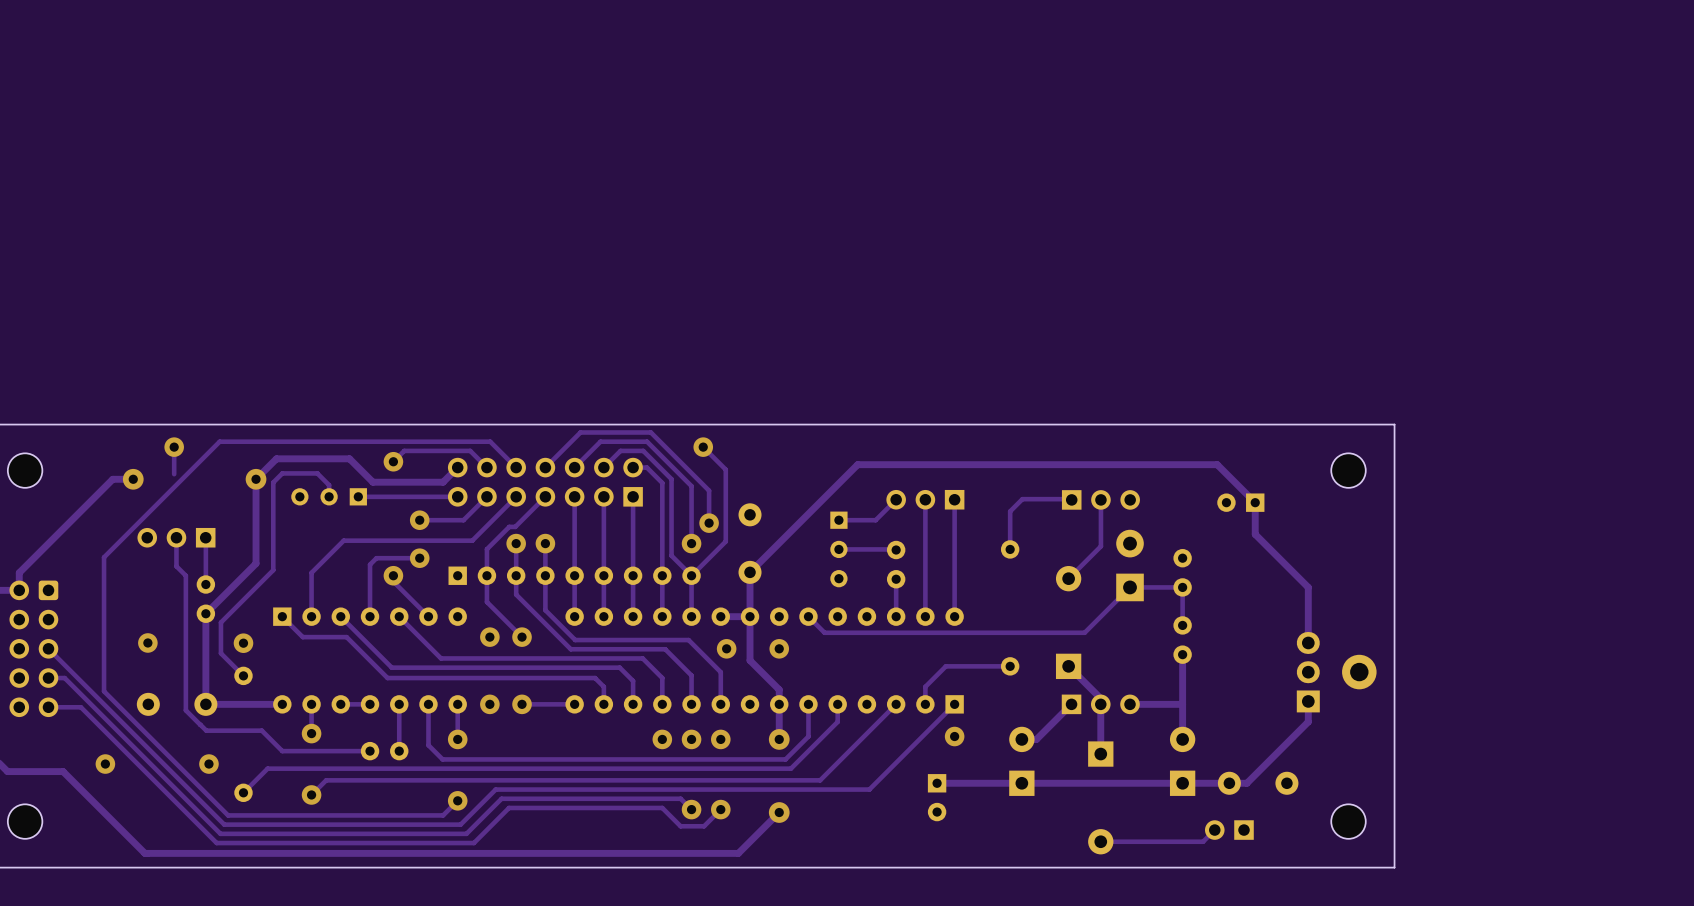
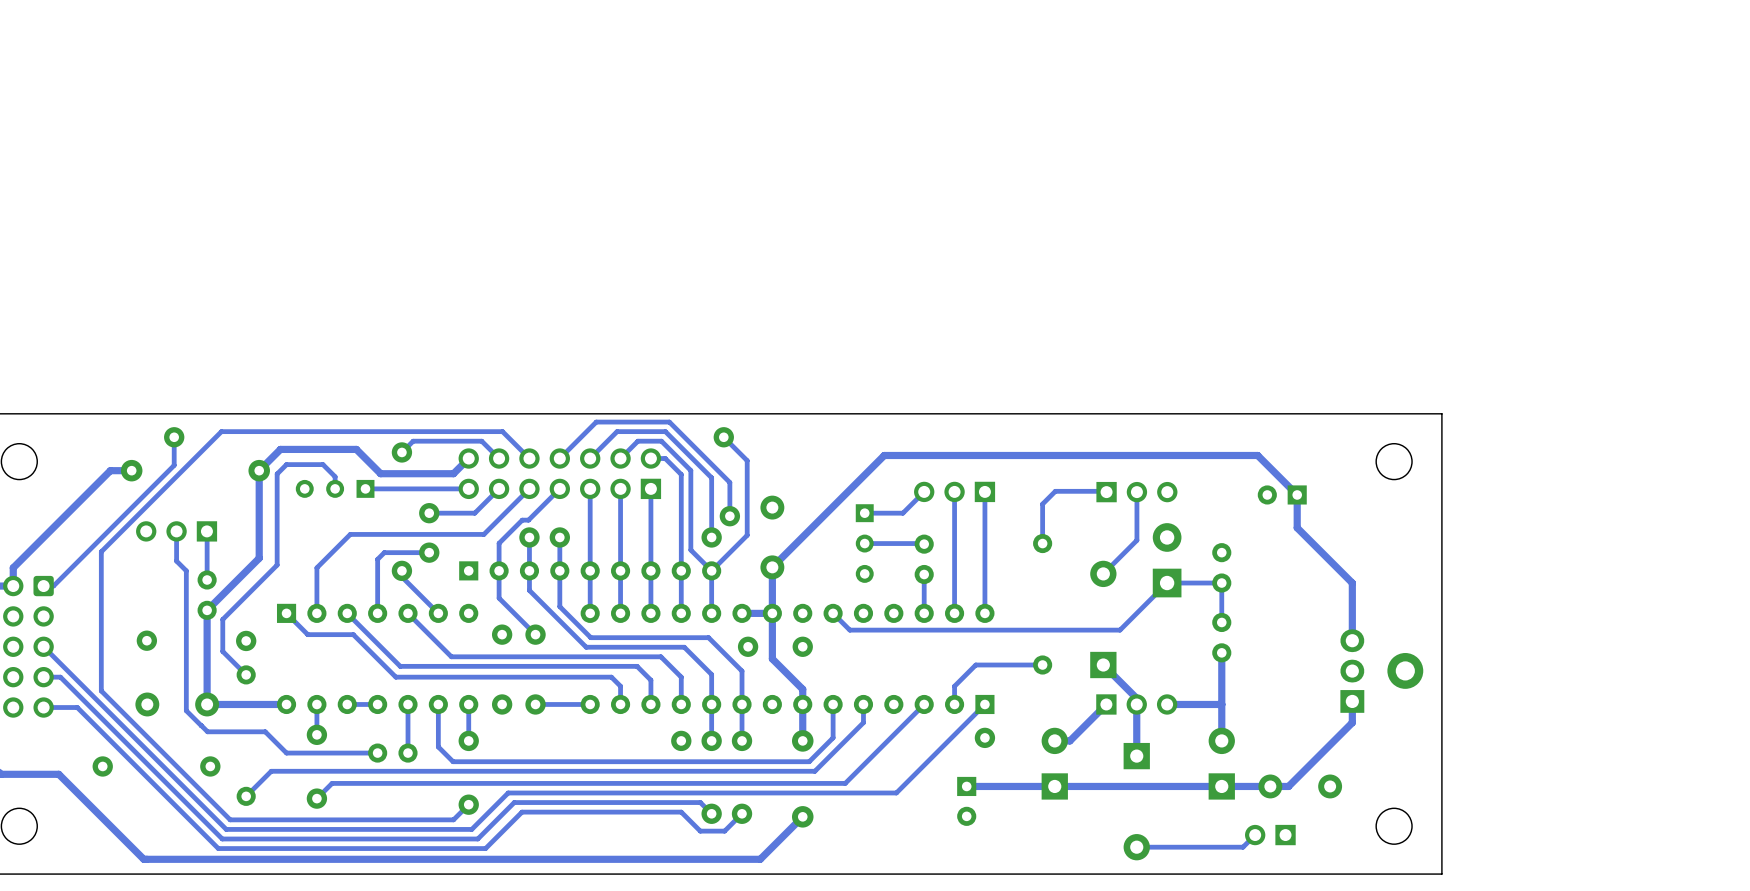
track: none -> (174, 465) (53, 586) (43, 586)
track: none -> (711, 704) (711, 740)
track: none -> (742, 704) (742, 740)

